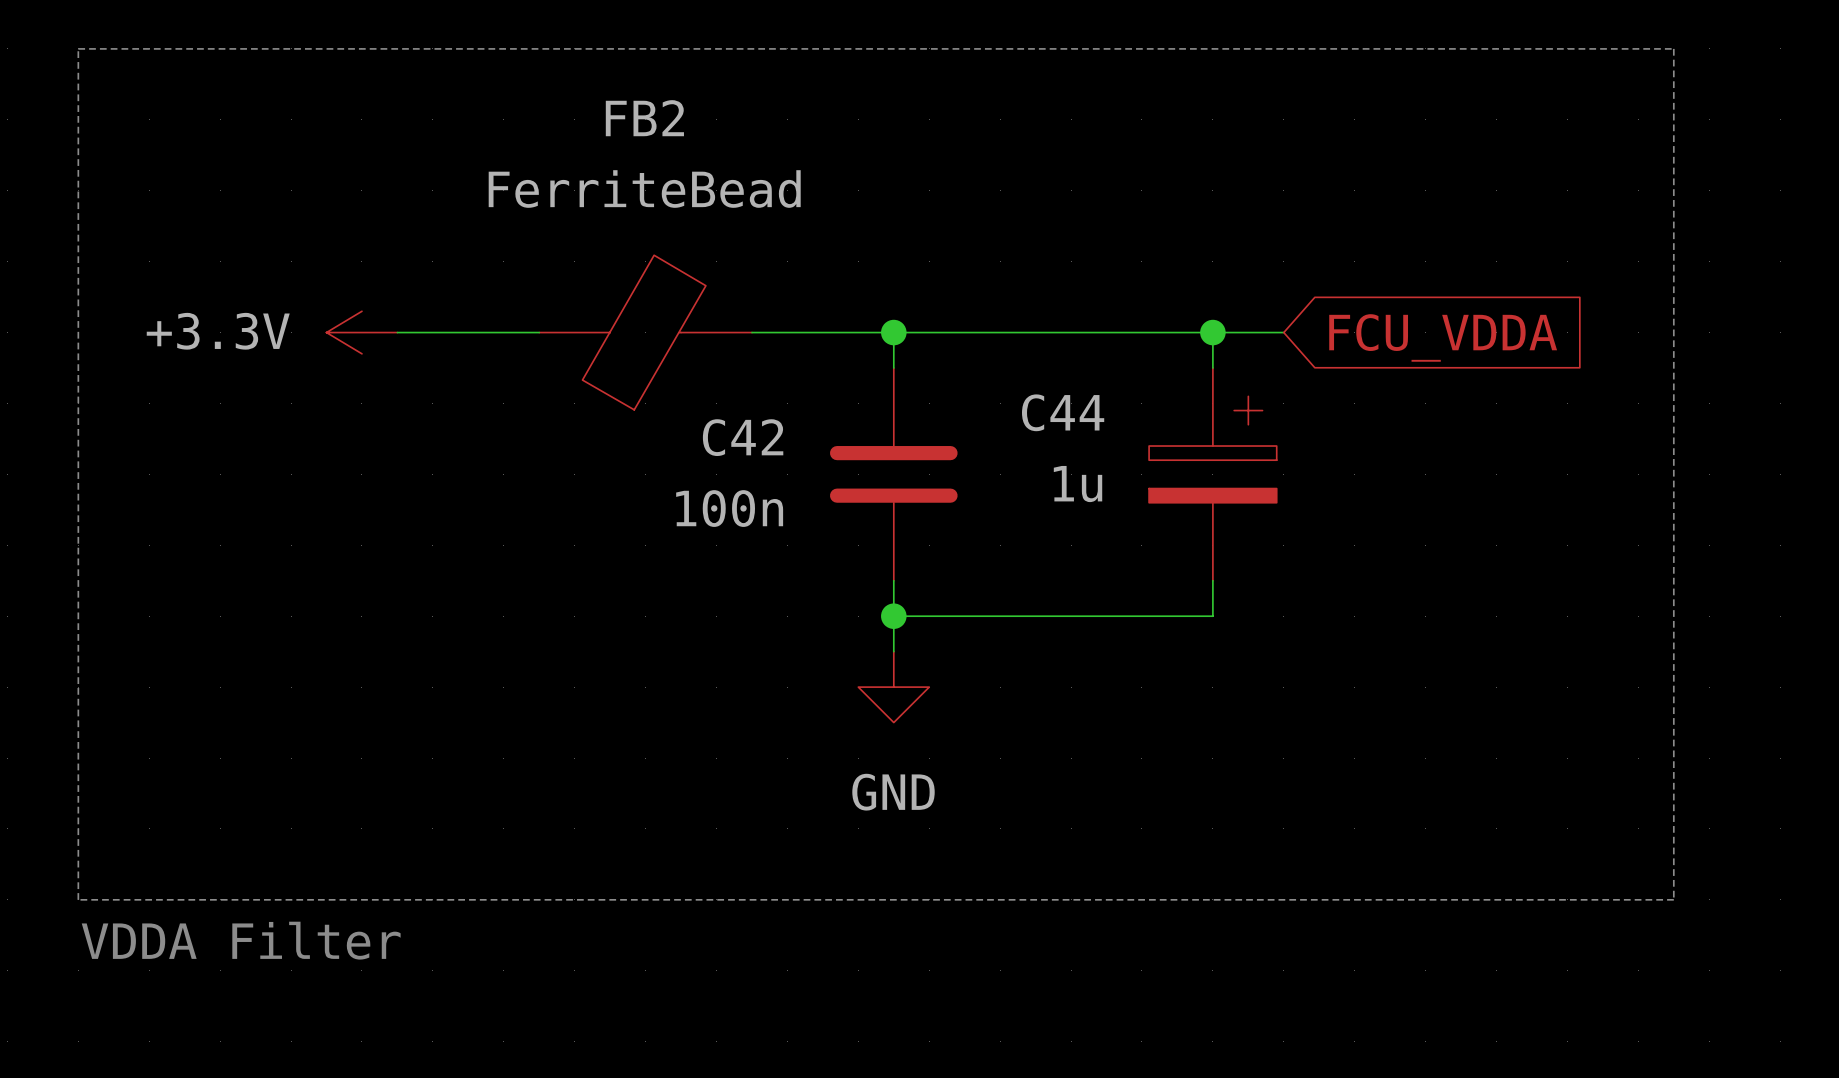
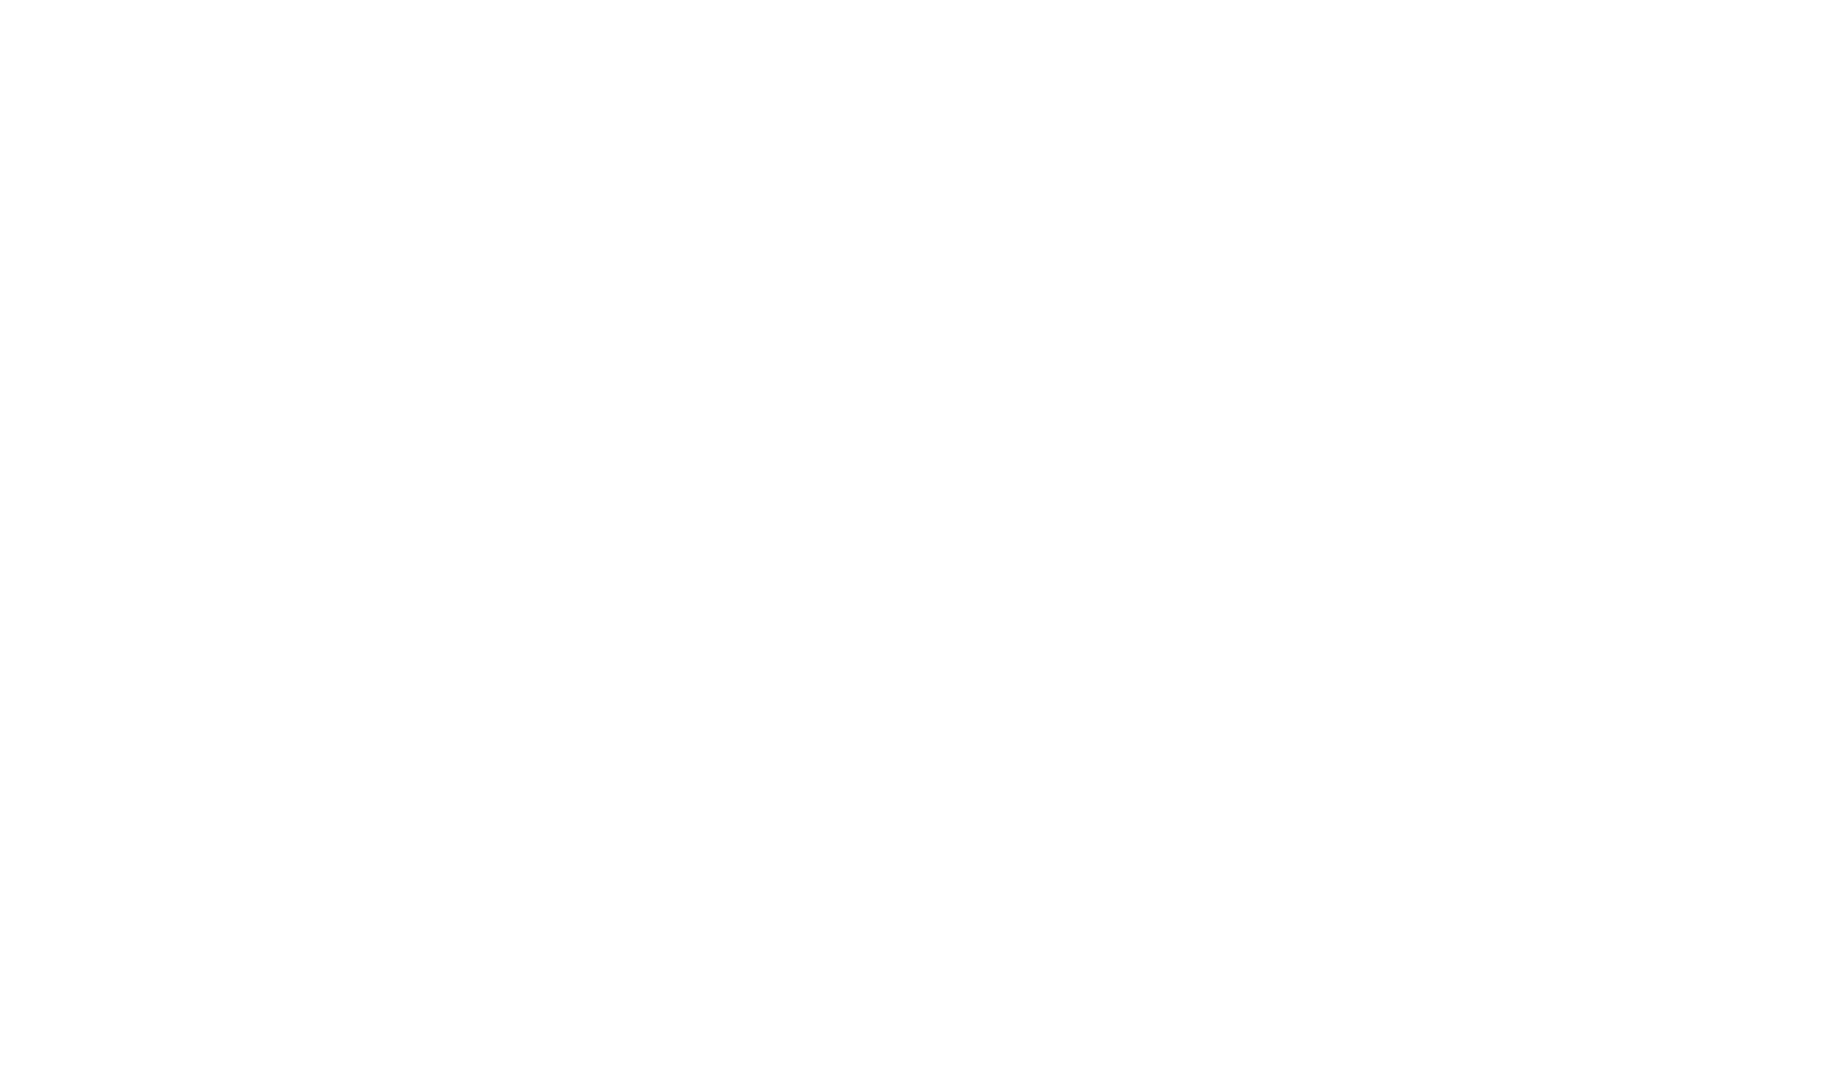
line: (78, 48) (1673, 48) (1673, 899) (78, 899) (78, 48) -> none
power symbol: +3.3V (361, 332) -> none
wire: (397, 332) (539, 332) -> none
FB2: FerriteBead (645, 332) -> none
wire: (751, 332) (1283, 332) -> none
wire: (893, 332) (893, 368) -> none
junction: (893, 332) -> none
wire: (1212, 332) (1212, 368) -> none
junction: (1212, 332) -> none
global label: FCU_VDDA (1443, 337) -> none
C42: 100n (893, 474) -> none
C44: 1u (1212, 474) -> none
wire: (893, 580) (893, 651) -> none
wire: (1212, 580) (1212, 616) (893, 616) -> none
junction: (893, 616) -> none
power symbol: GND (893, 687) -> none
text: VDDA Filter (241, 940) -> none

